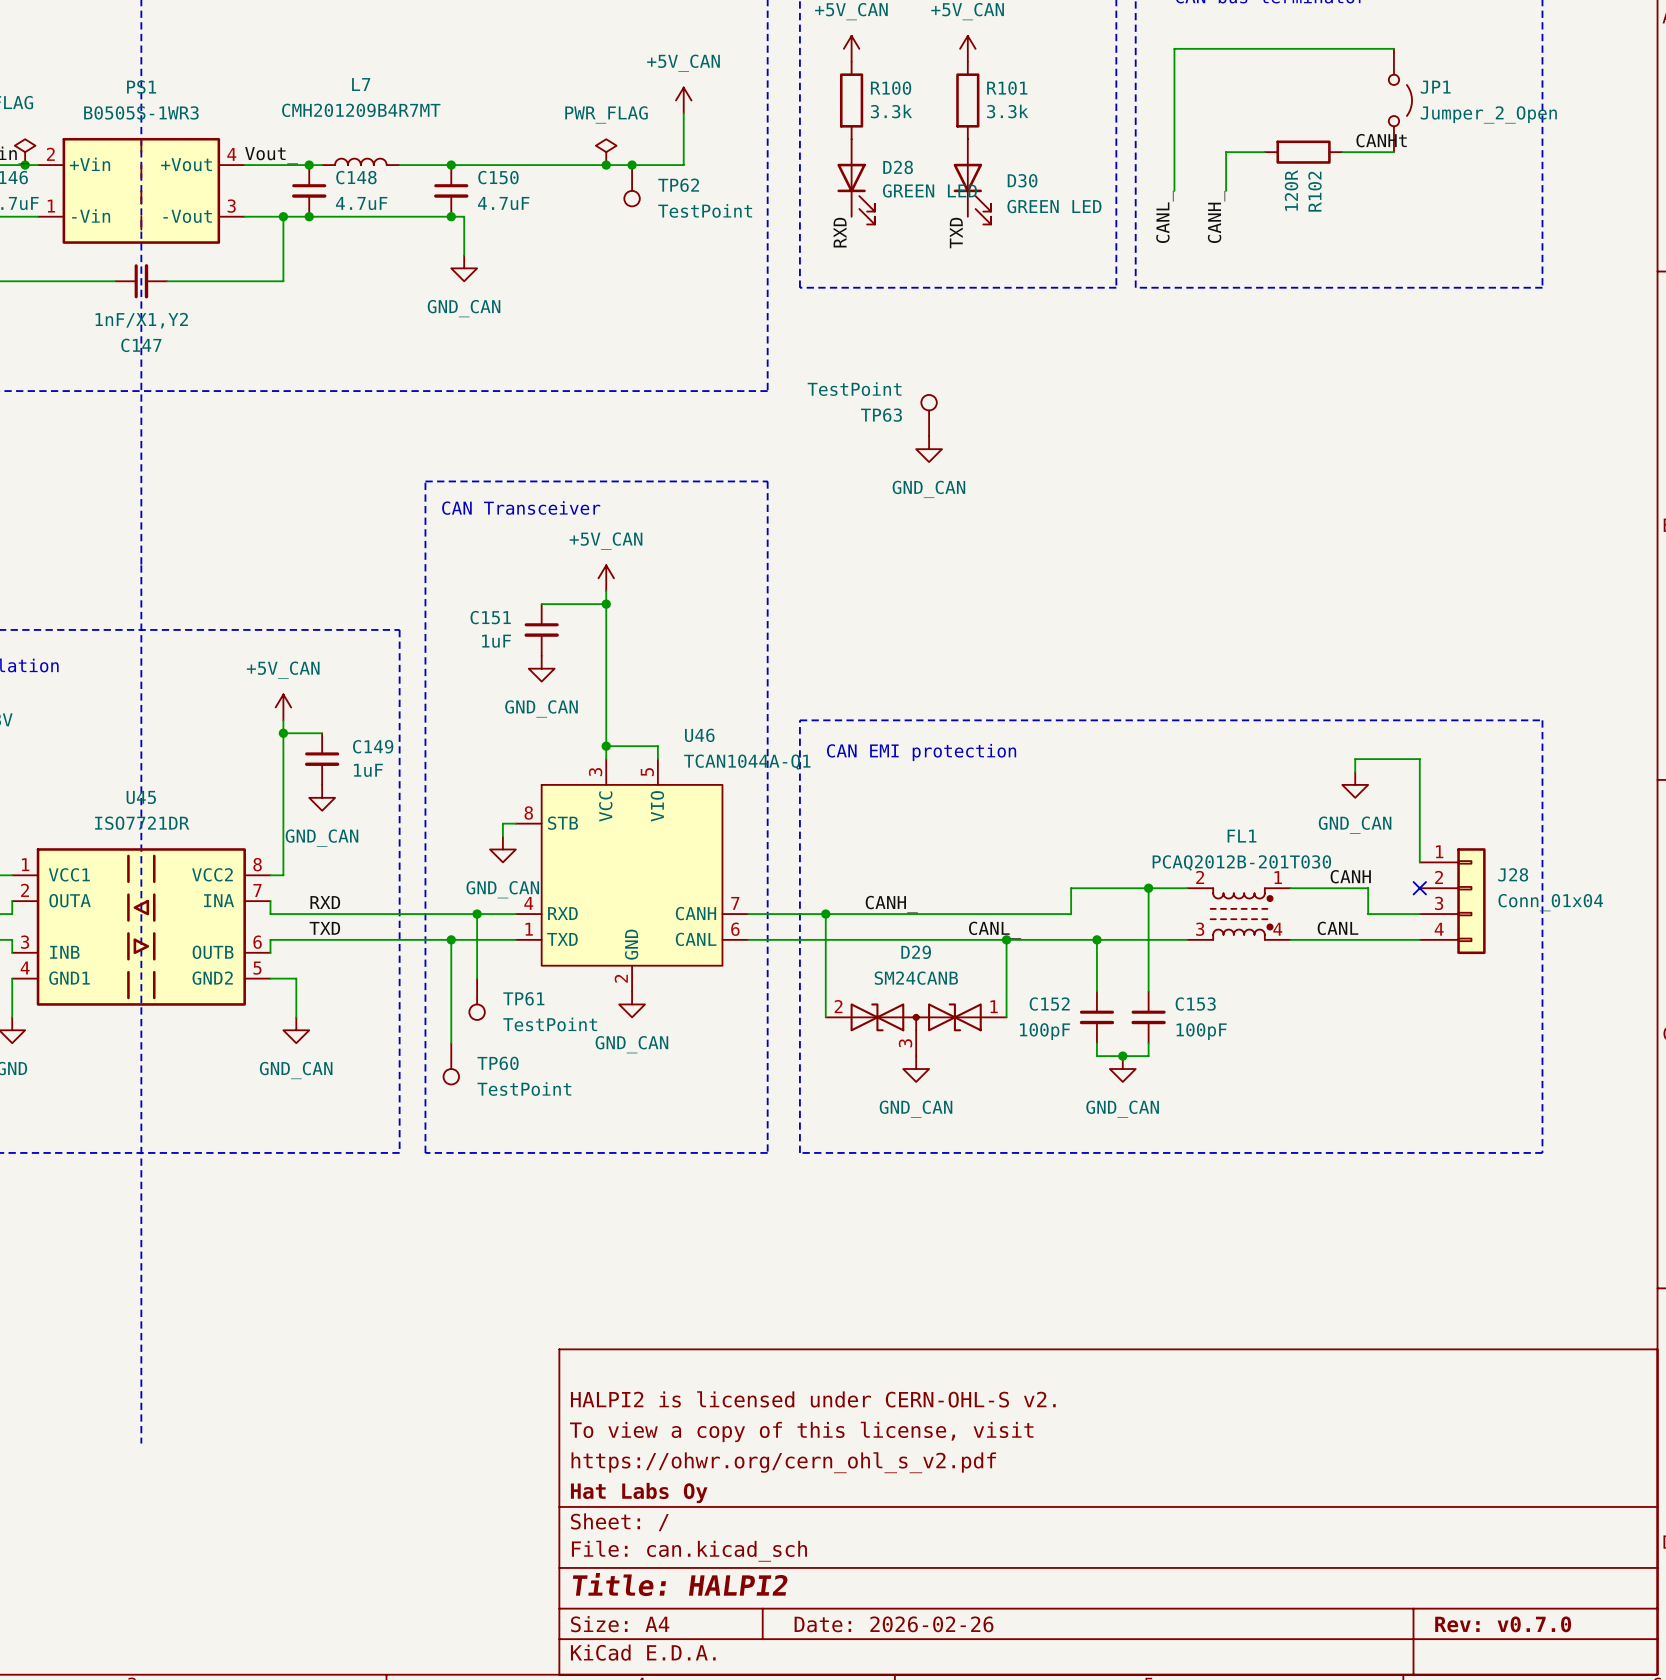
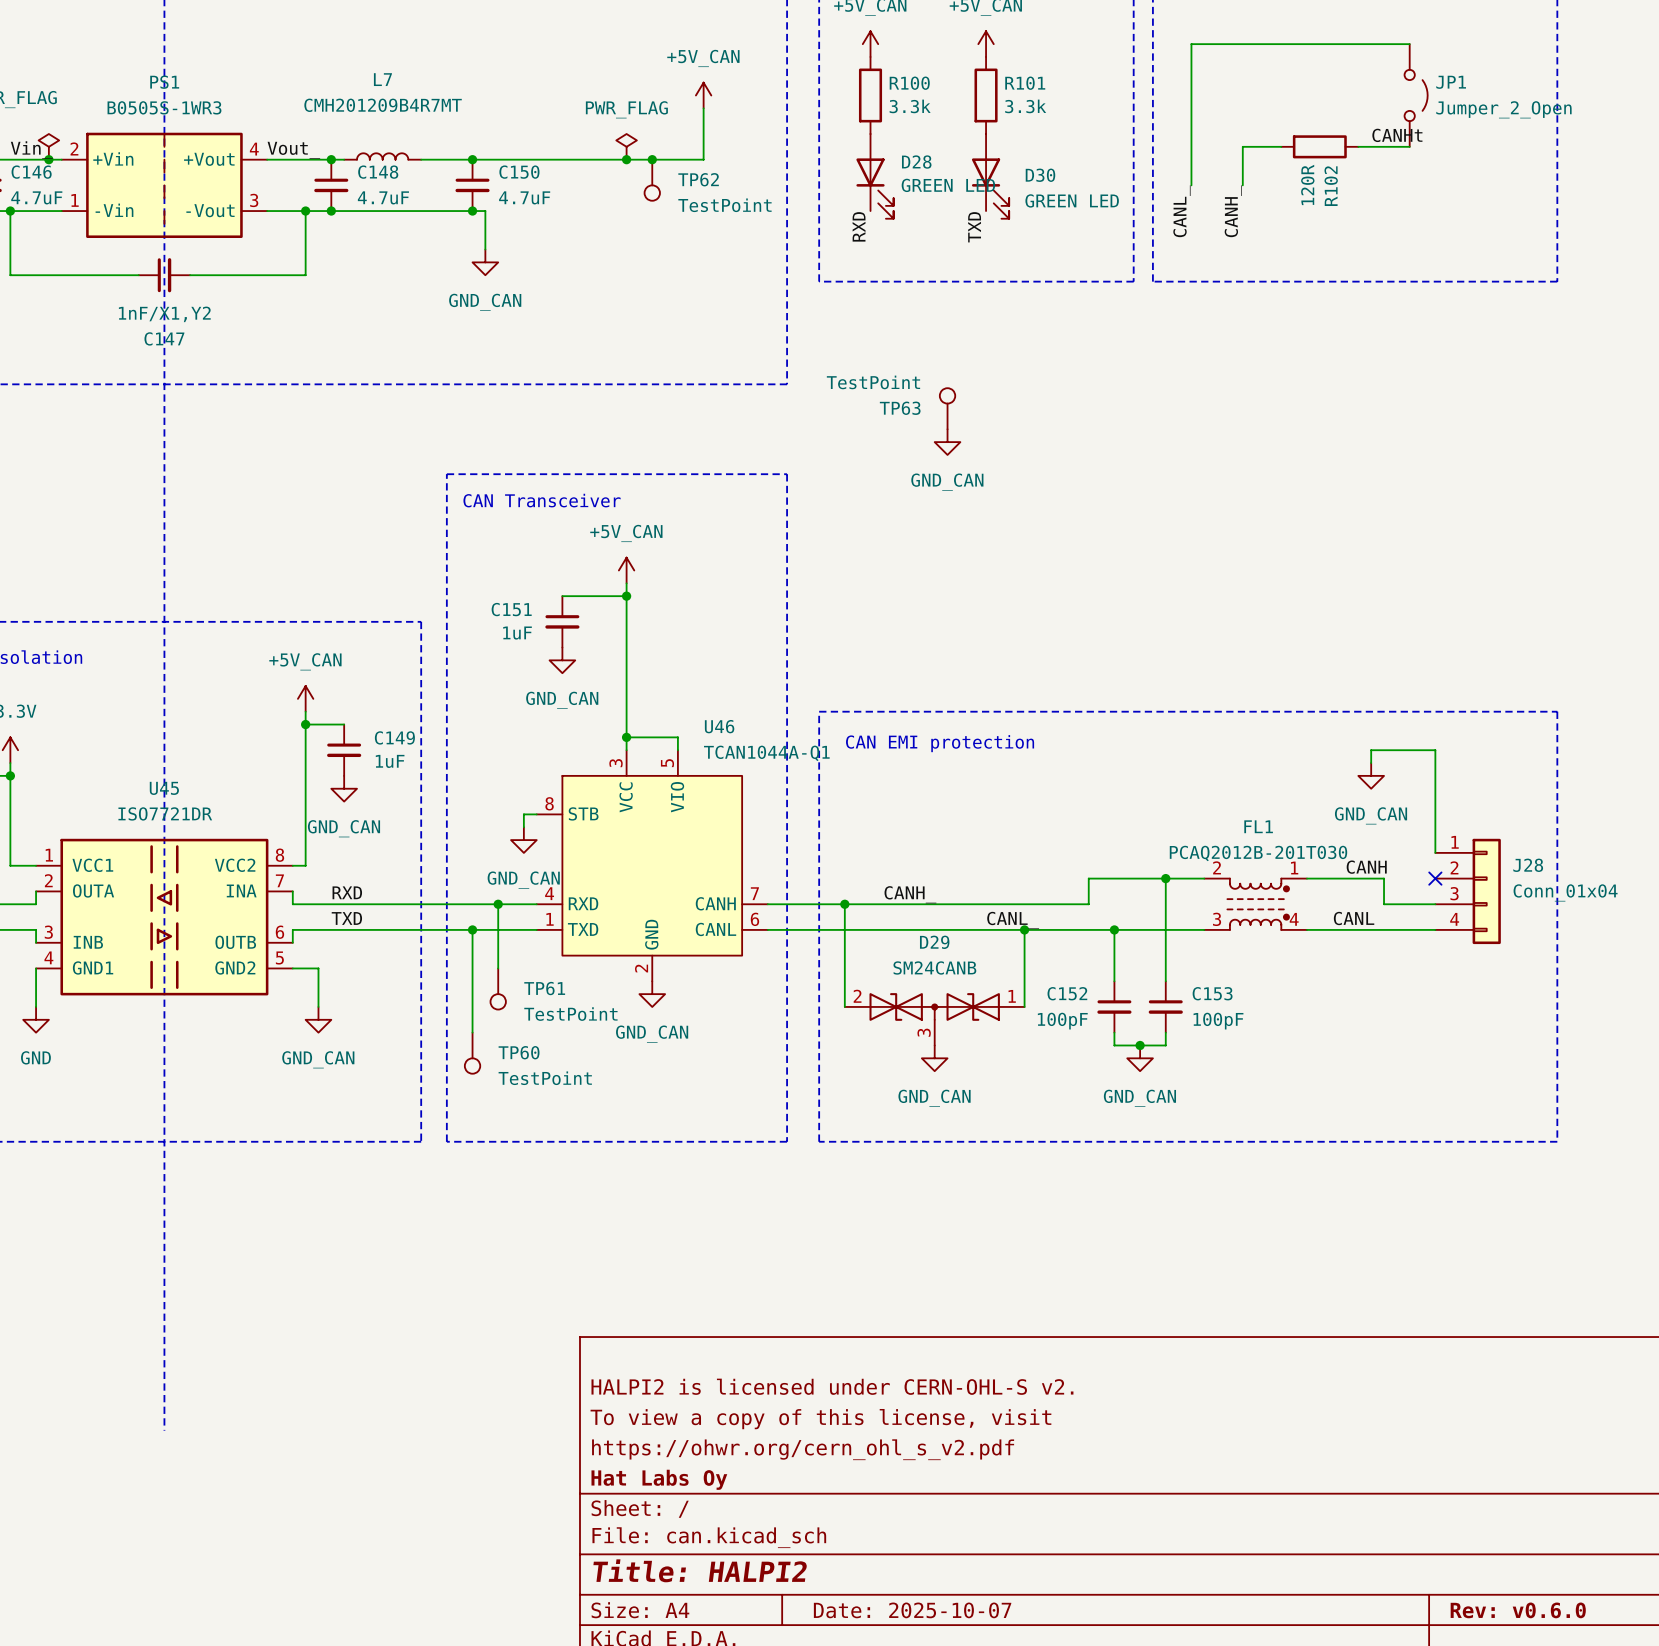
title block: Date: 2026-02-26 (894, 1624) -> Date: 2025-10-07 (912, 1610)
title block: Rev: v0.7.0 (1503, 1624) -> Rev: v0.6.0 (1518, 1610)

